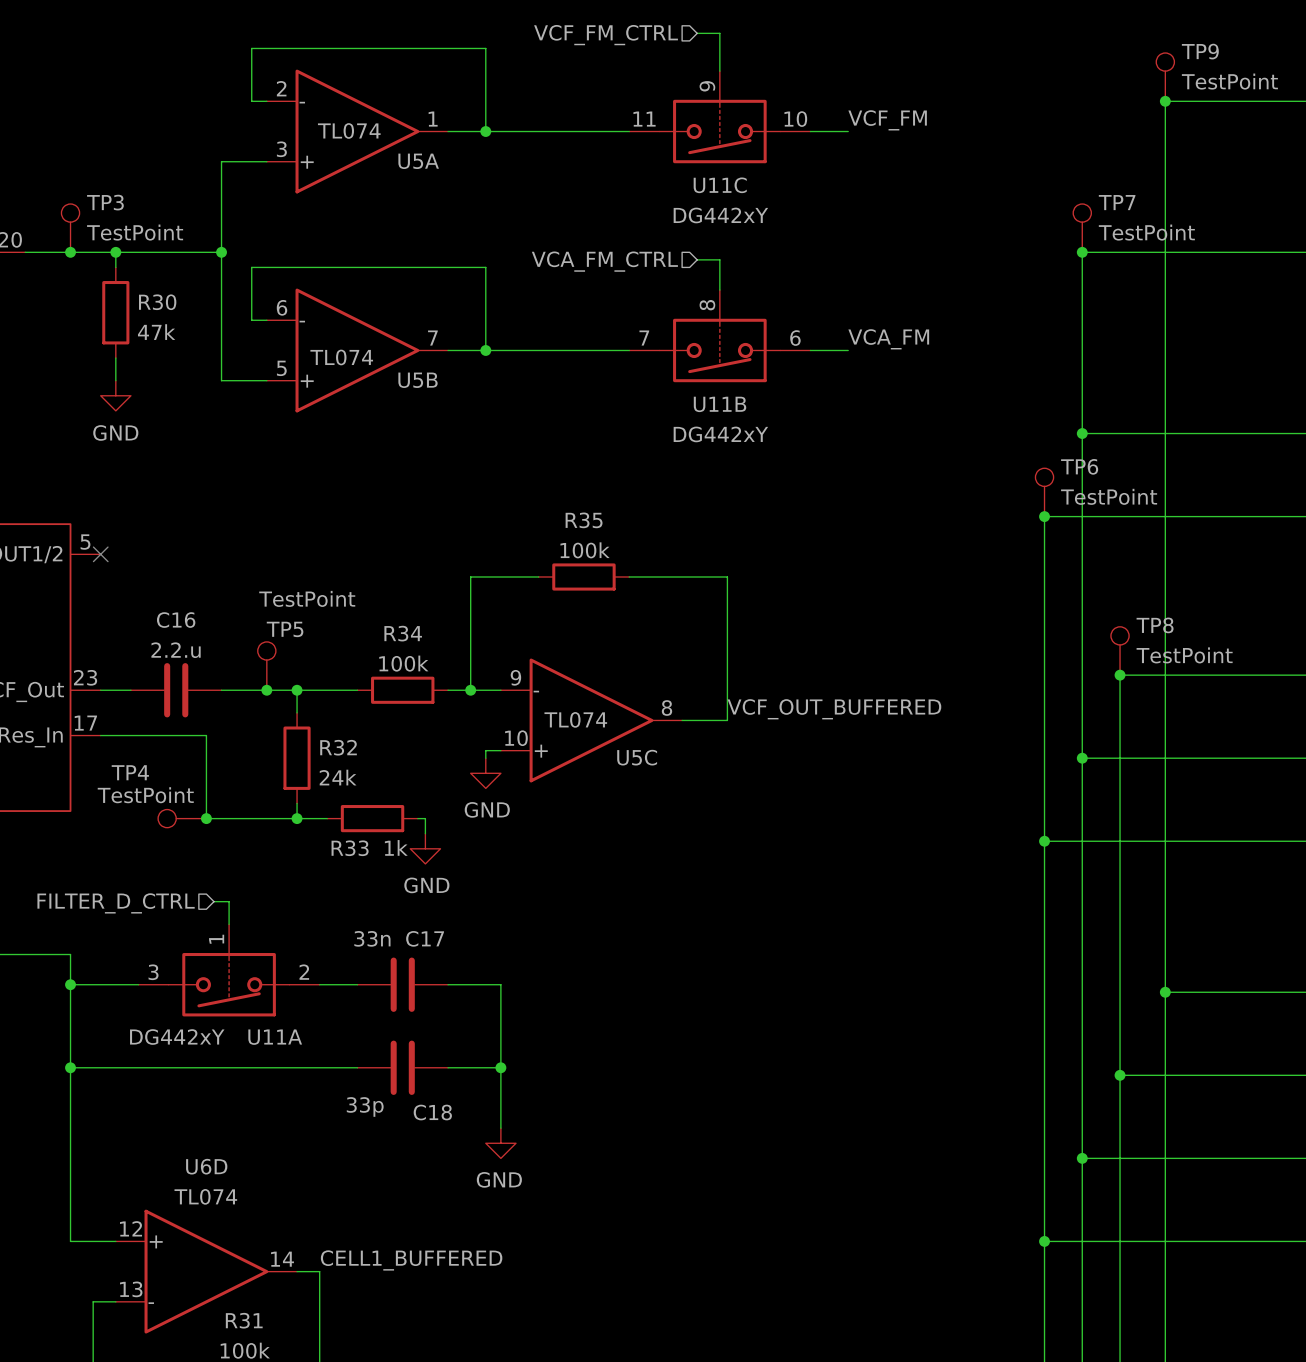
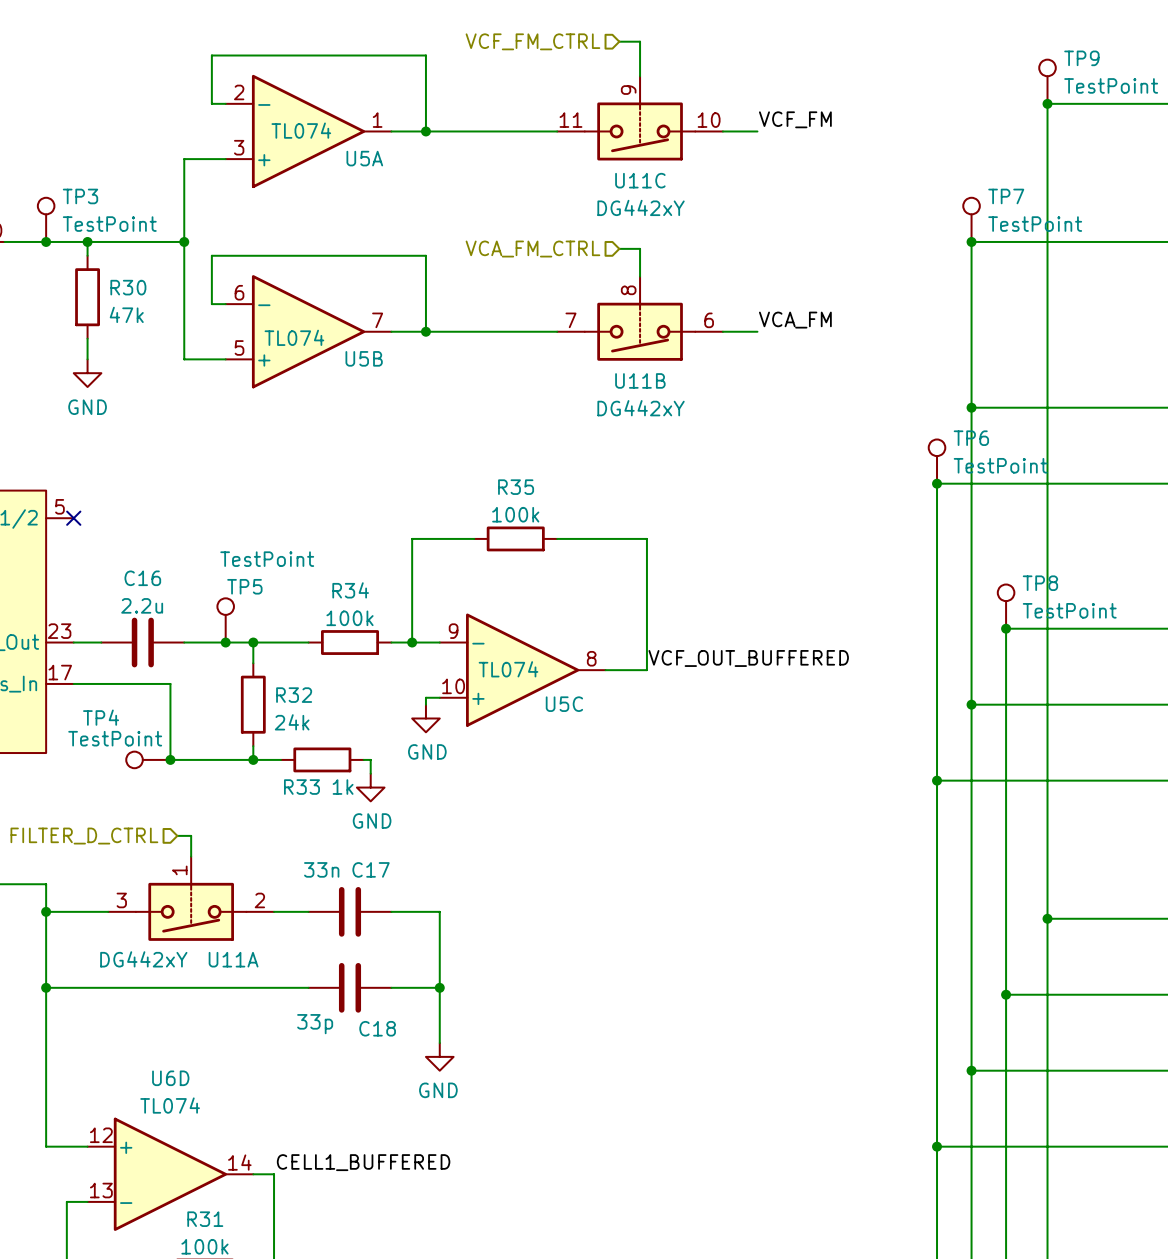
C16 value: 2.2.u (176, 650) -> 2.2u (142, 605)

